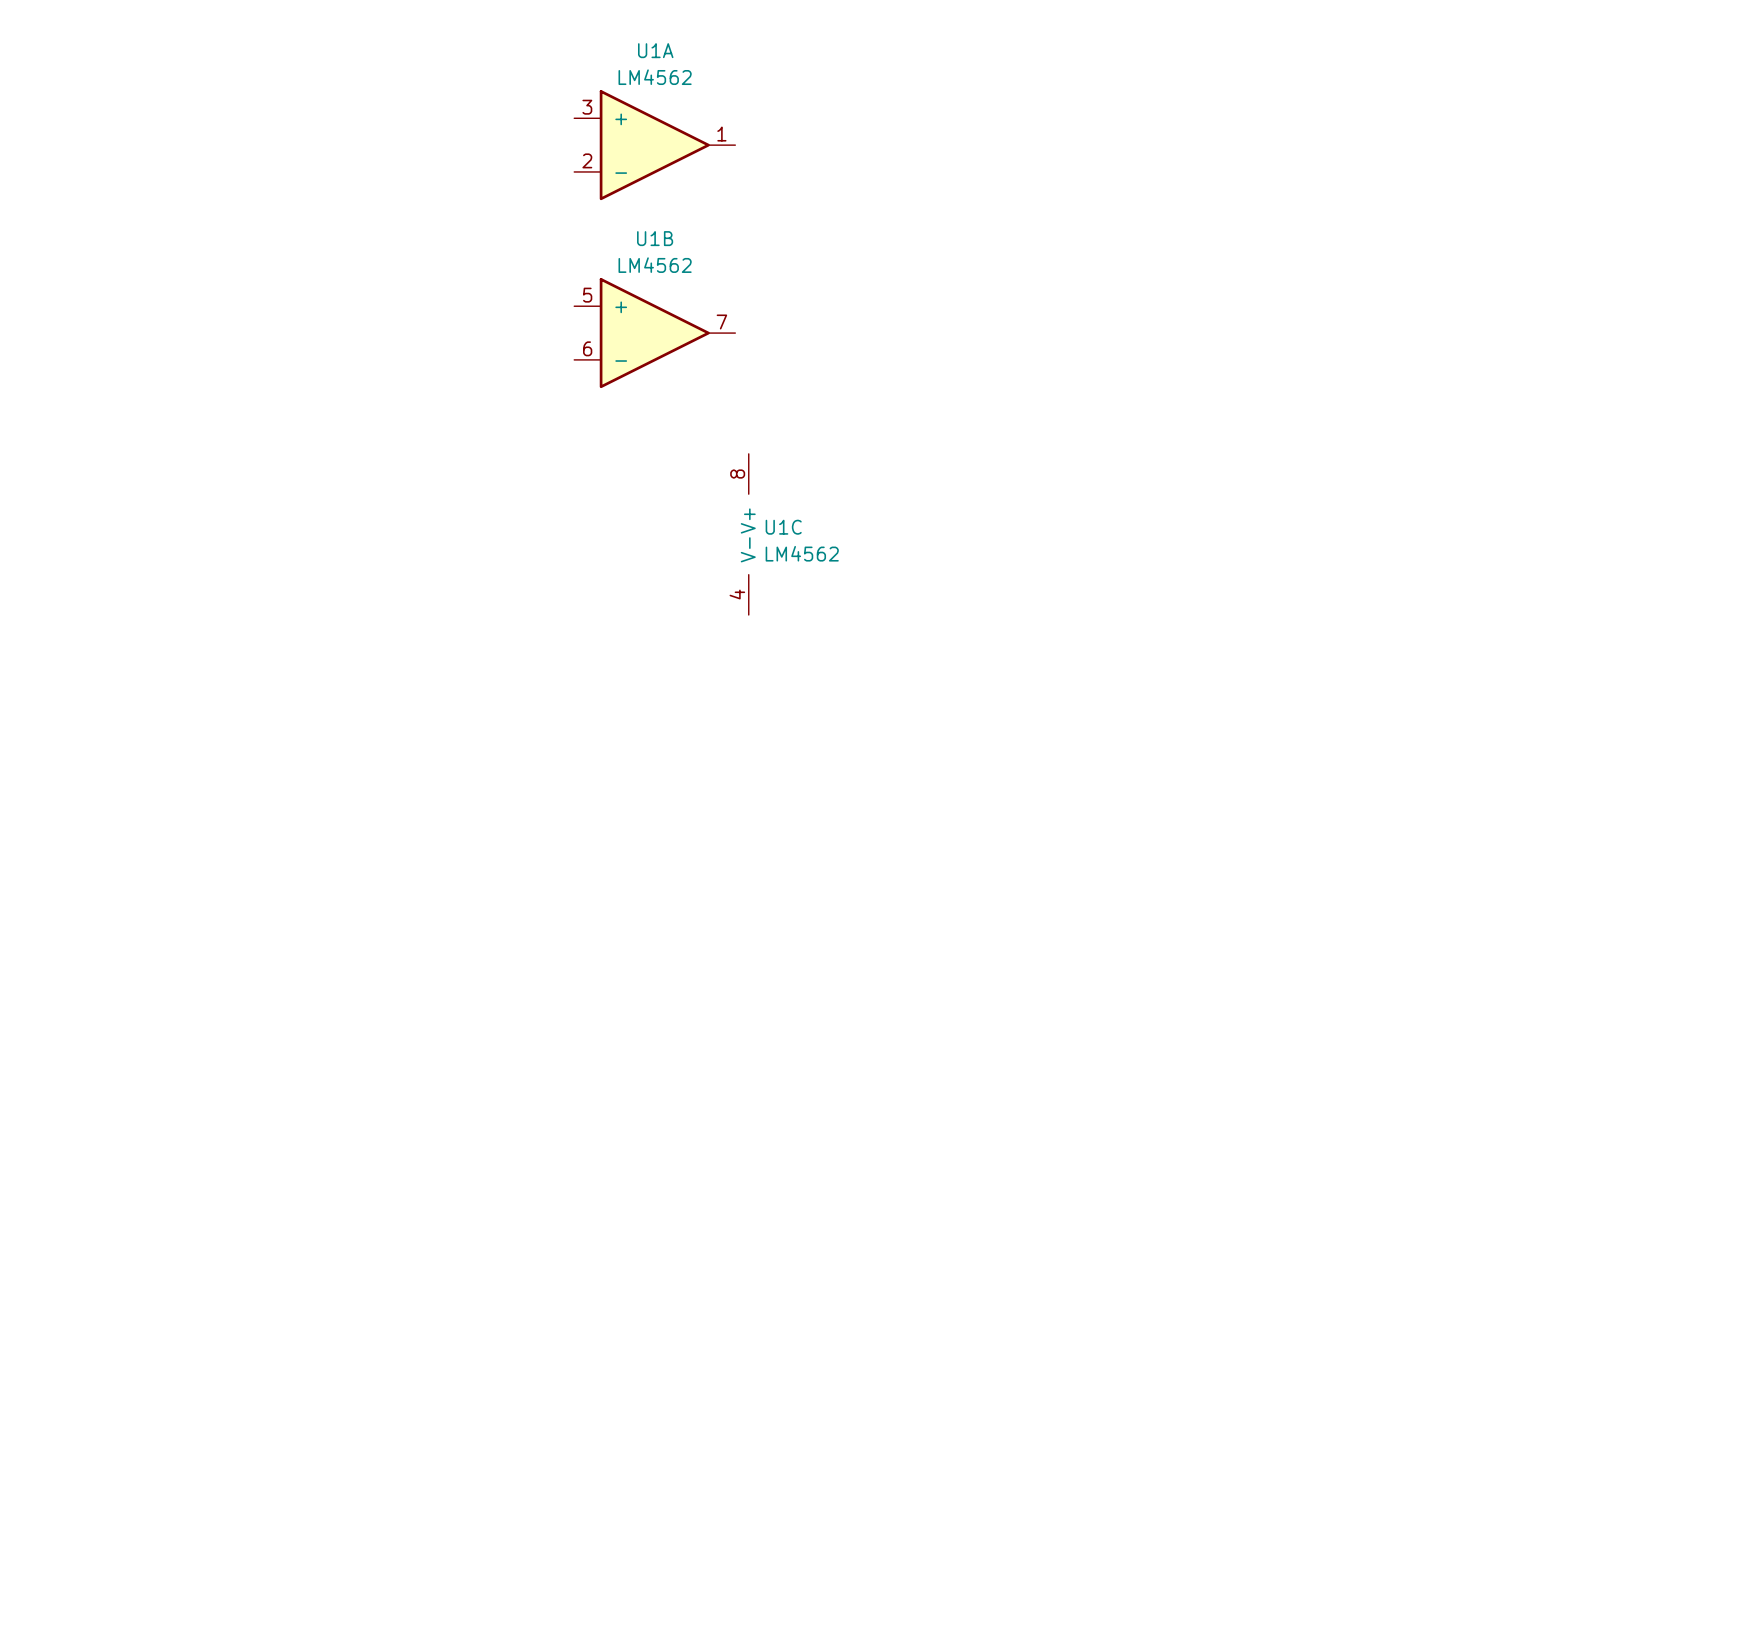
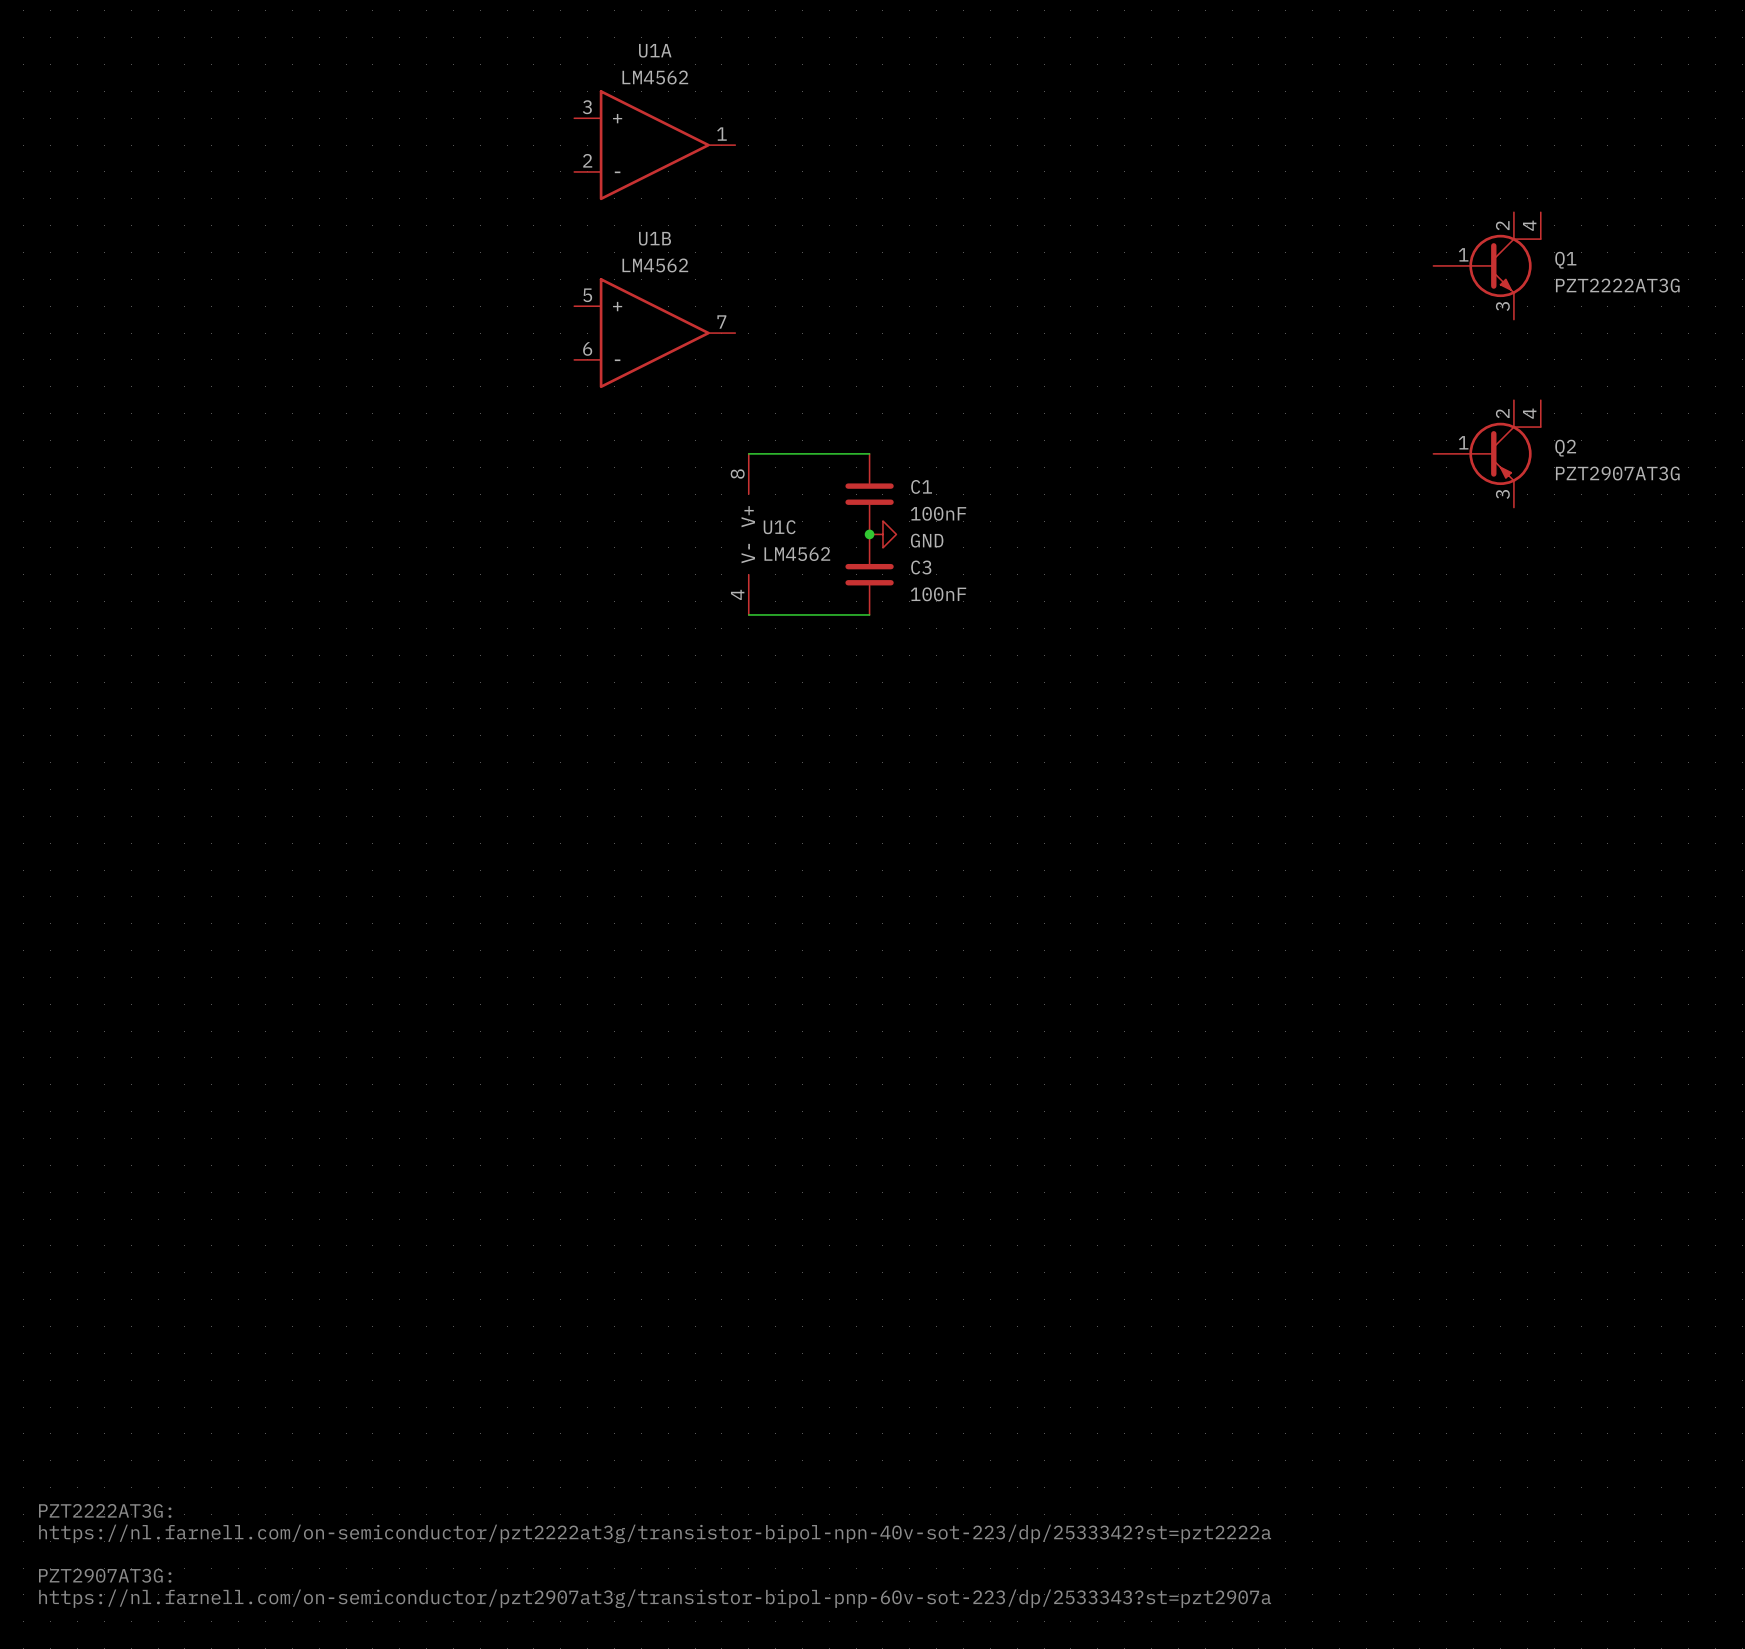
Q1: none -> PZT2222AT3G (1487, 265)
wire: none -> (748, 453) (869, 453)
Q2: none -> PZT2907AT3G (1487, 453)
C1: none -> 100nF (869, 494)
junction: none -> (869, 534)
power symbol: none -> GND (882, 534)
C3: none -> 100nF (869, 574)
wire: none -> (748, 614) (869, 614)
text: none -> PZT2222AT3G: (105, 1510)
text: none -> https://nl.farnell.com/on-semiconductor/pzt2222at3g/transistor-bipol-npn-40v-sot-223/dp/2533342?st=pzt2222a (655, 1533)
text: none -> PZT2907AT3G: (105, 1575)
text: none -> https://nl.farnell.com/on-semiconductor/pzt2907at3g/transistor-bipol-pnp-60v-sot-223/dp/2533343?st=pzt2907a (655, 1598)

